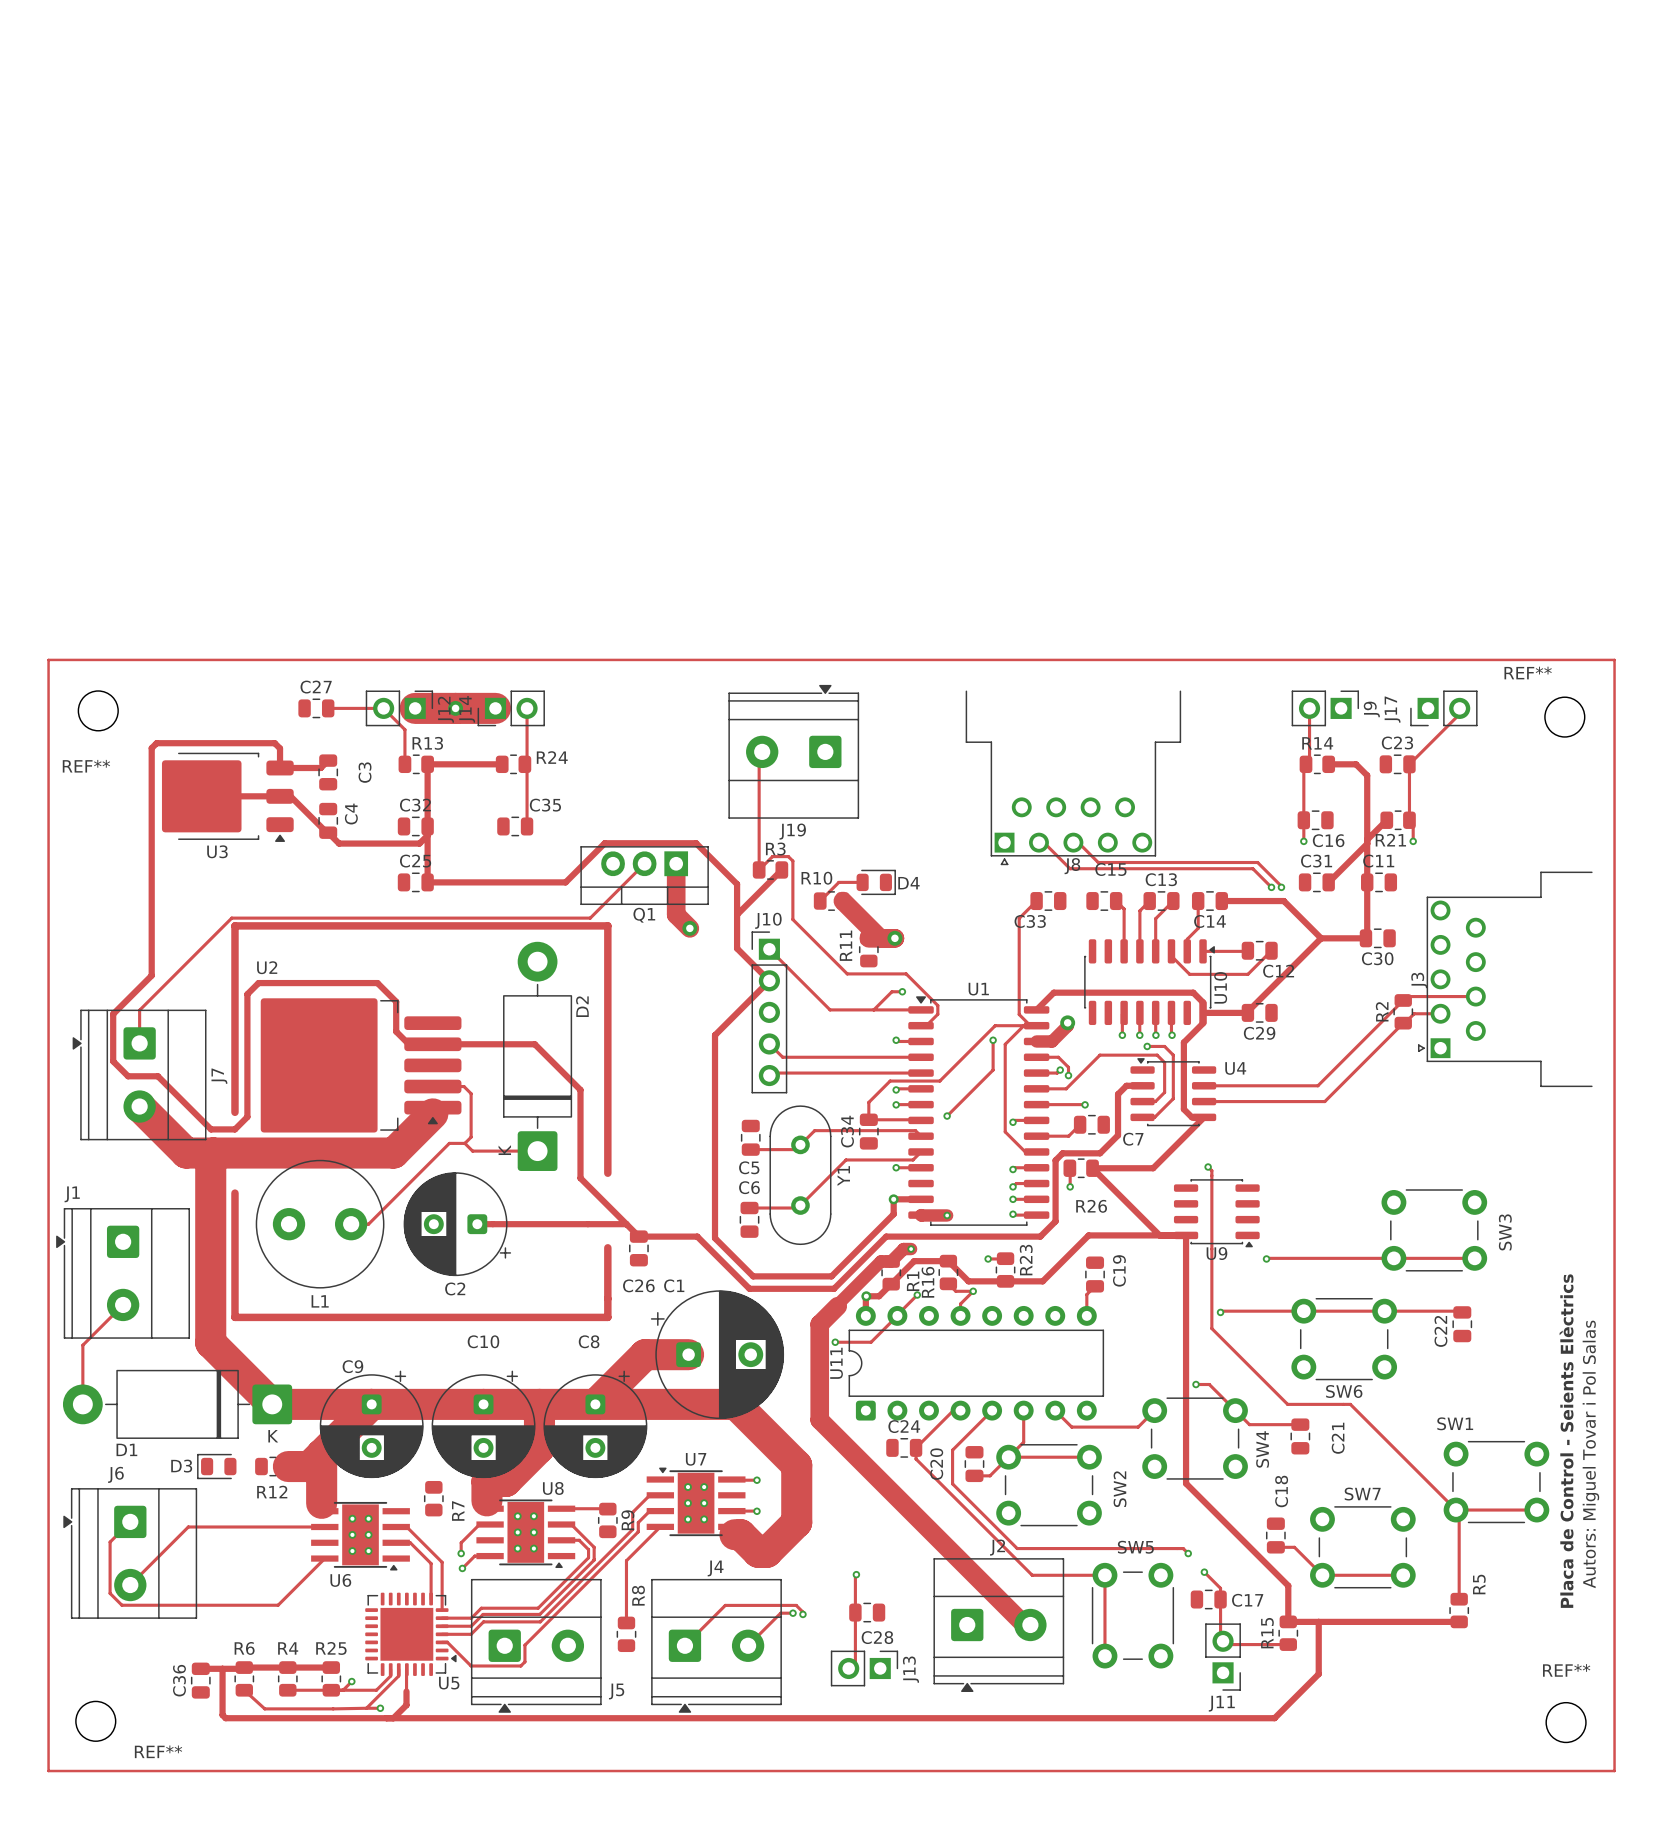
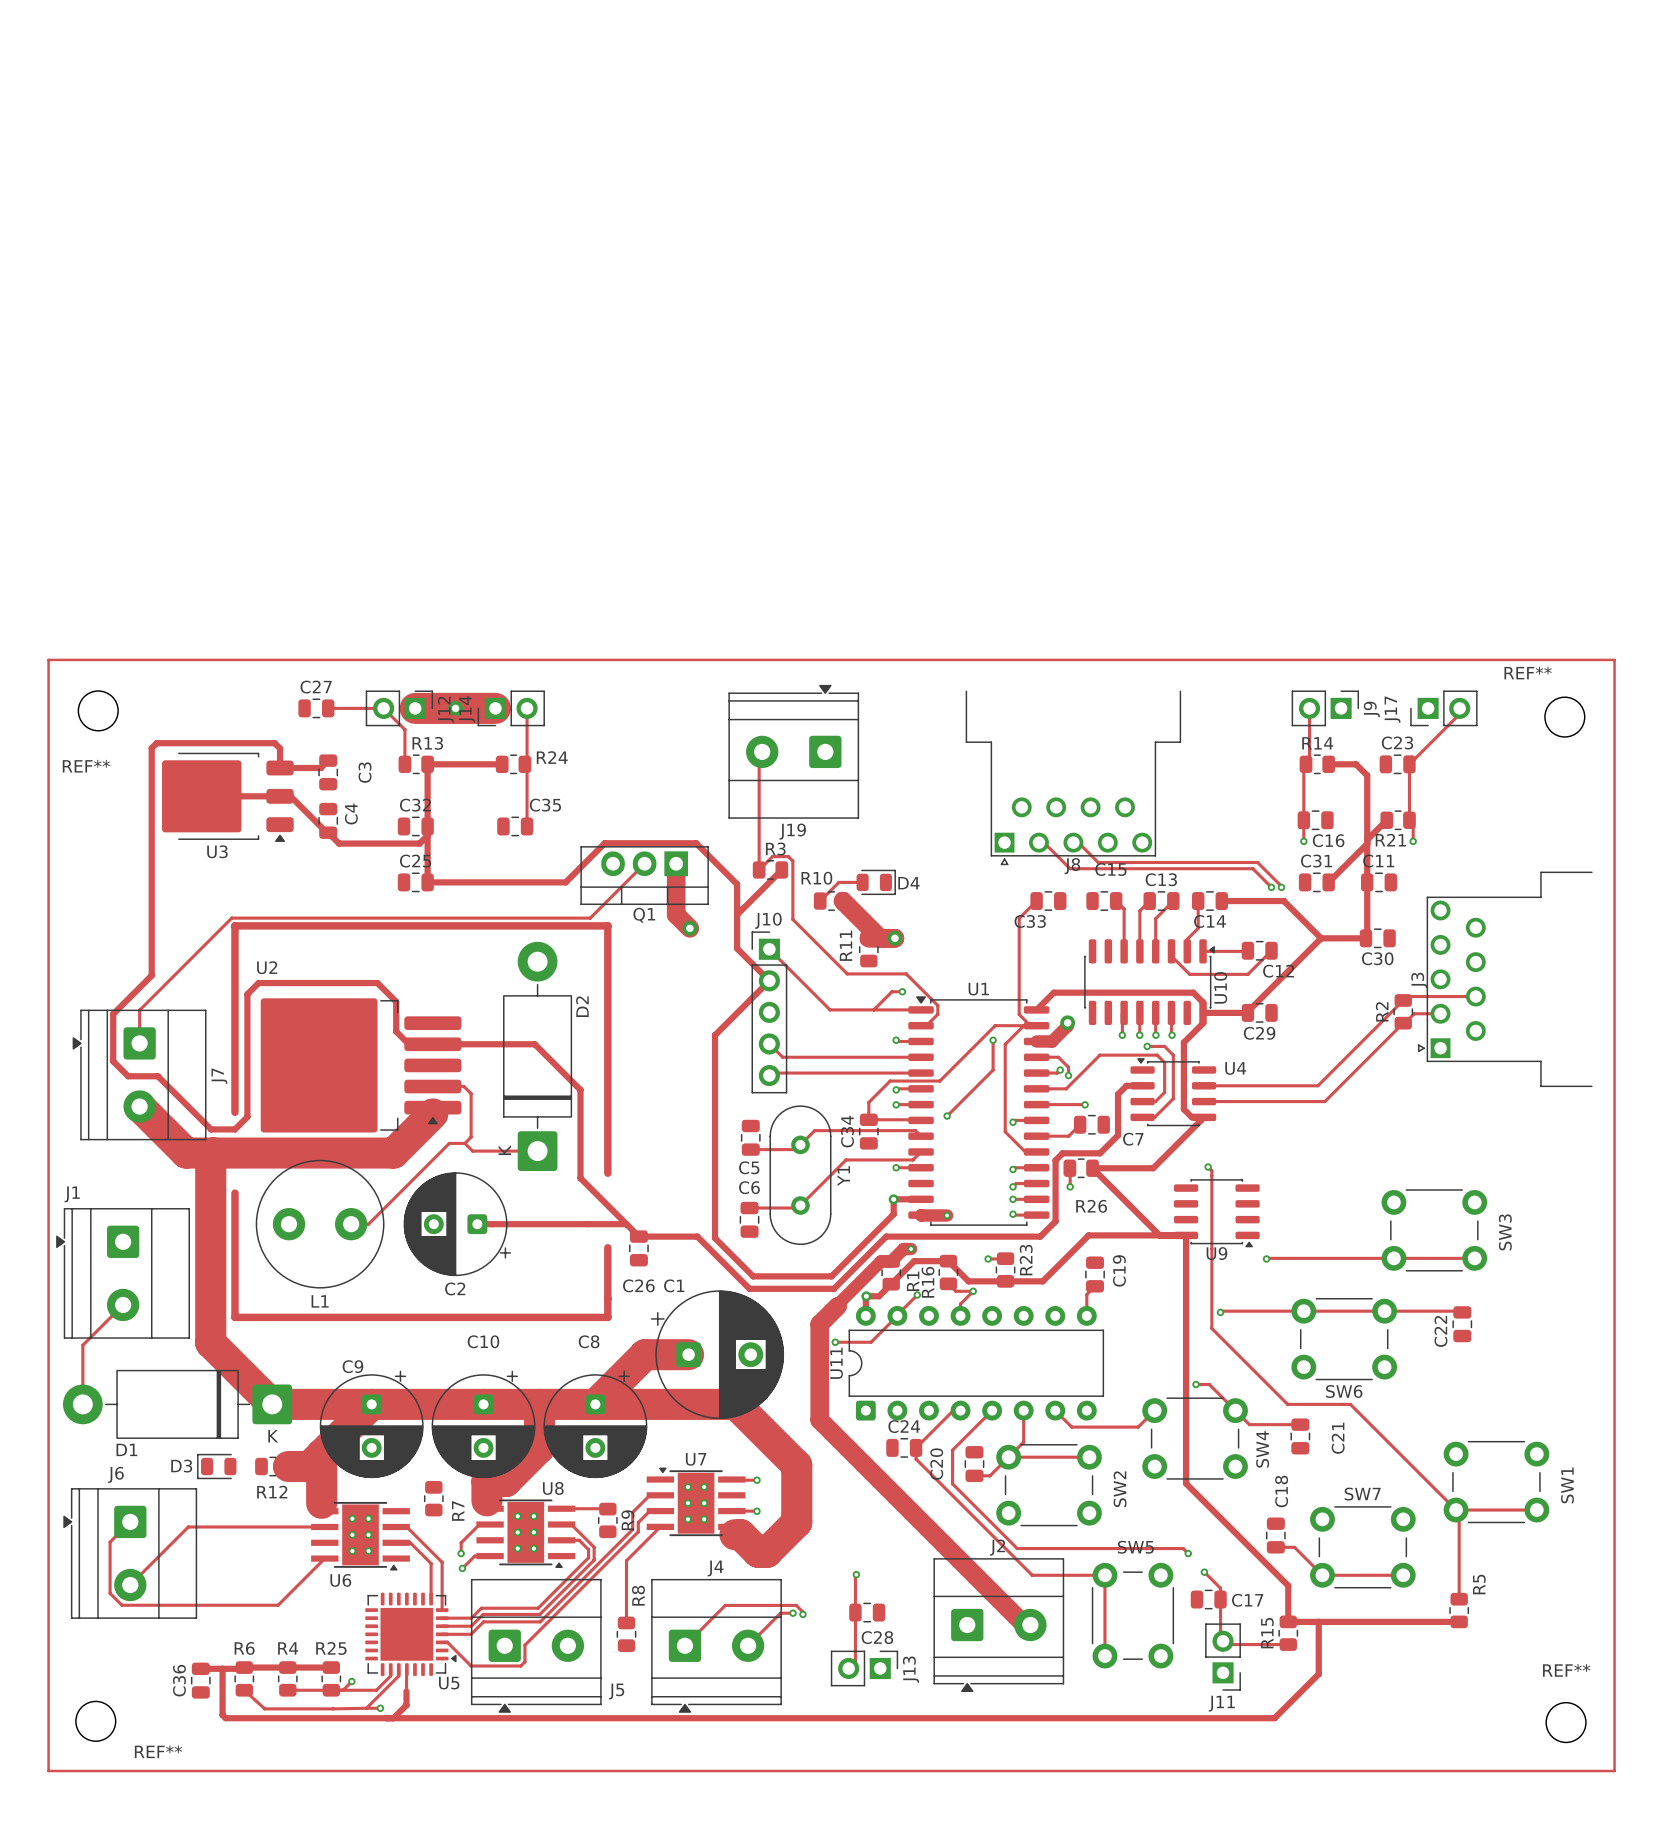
SW1 name rotation: 0° (1455, 1423) -> 90° counterclockwise (1567, 1485)
SW1 name position: SW1 (1455, 1423) -> SW1 (1567, 1485)
text: Placa de Control - Seients Elèctrics (1566, 1441) -> none
text: Autors: Miguel Tovar i Pol Salas (1590, 1454) -> none

